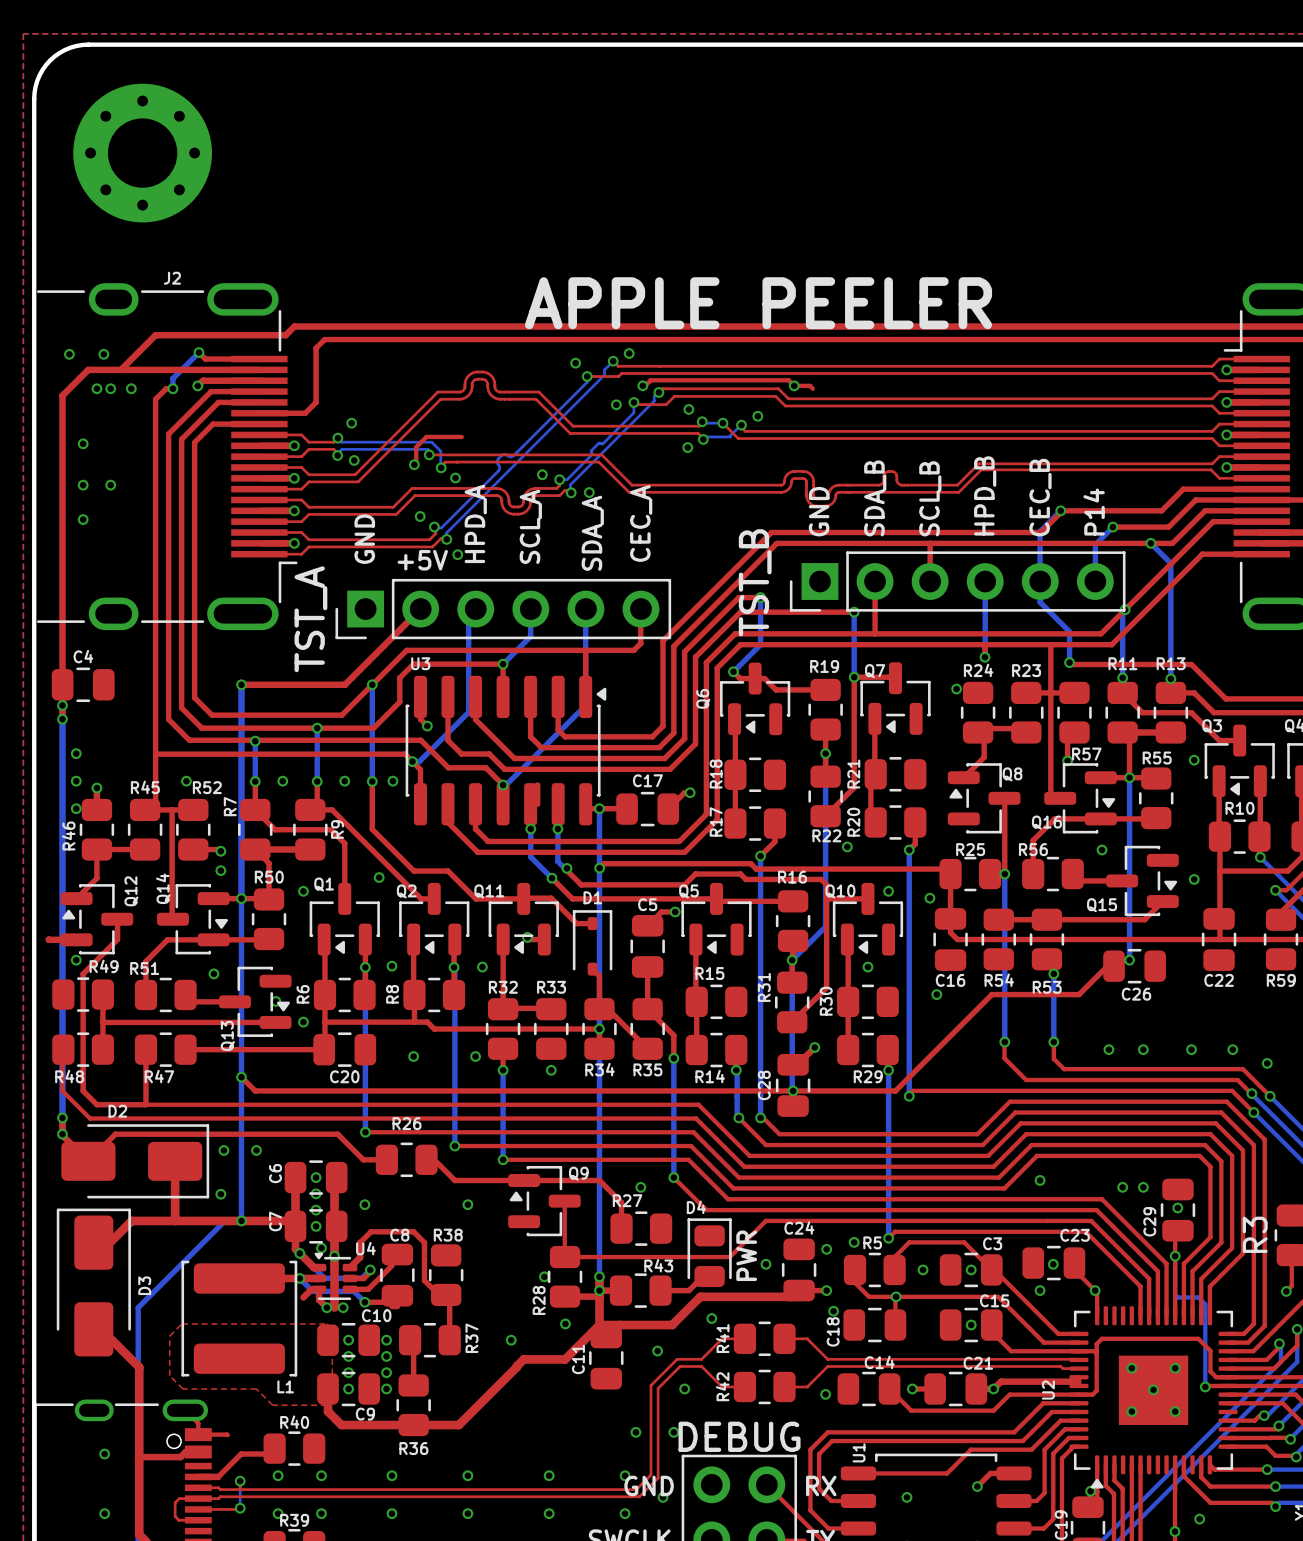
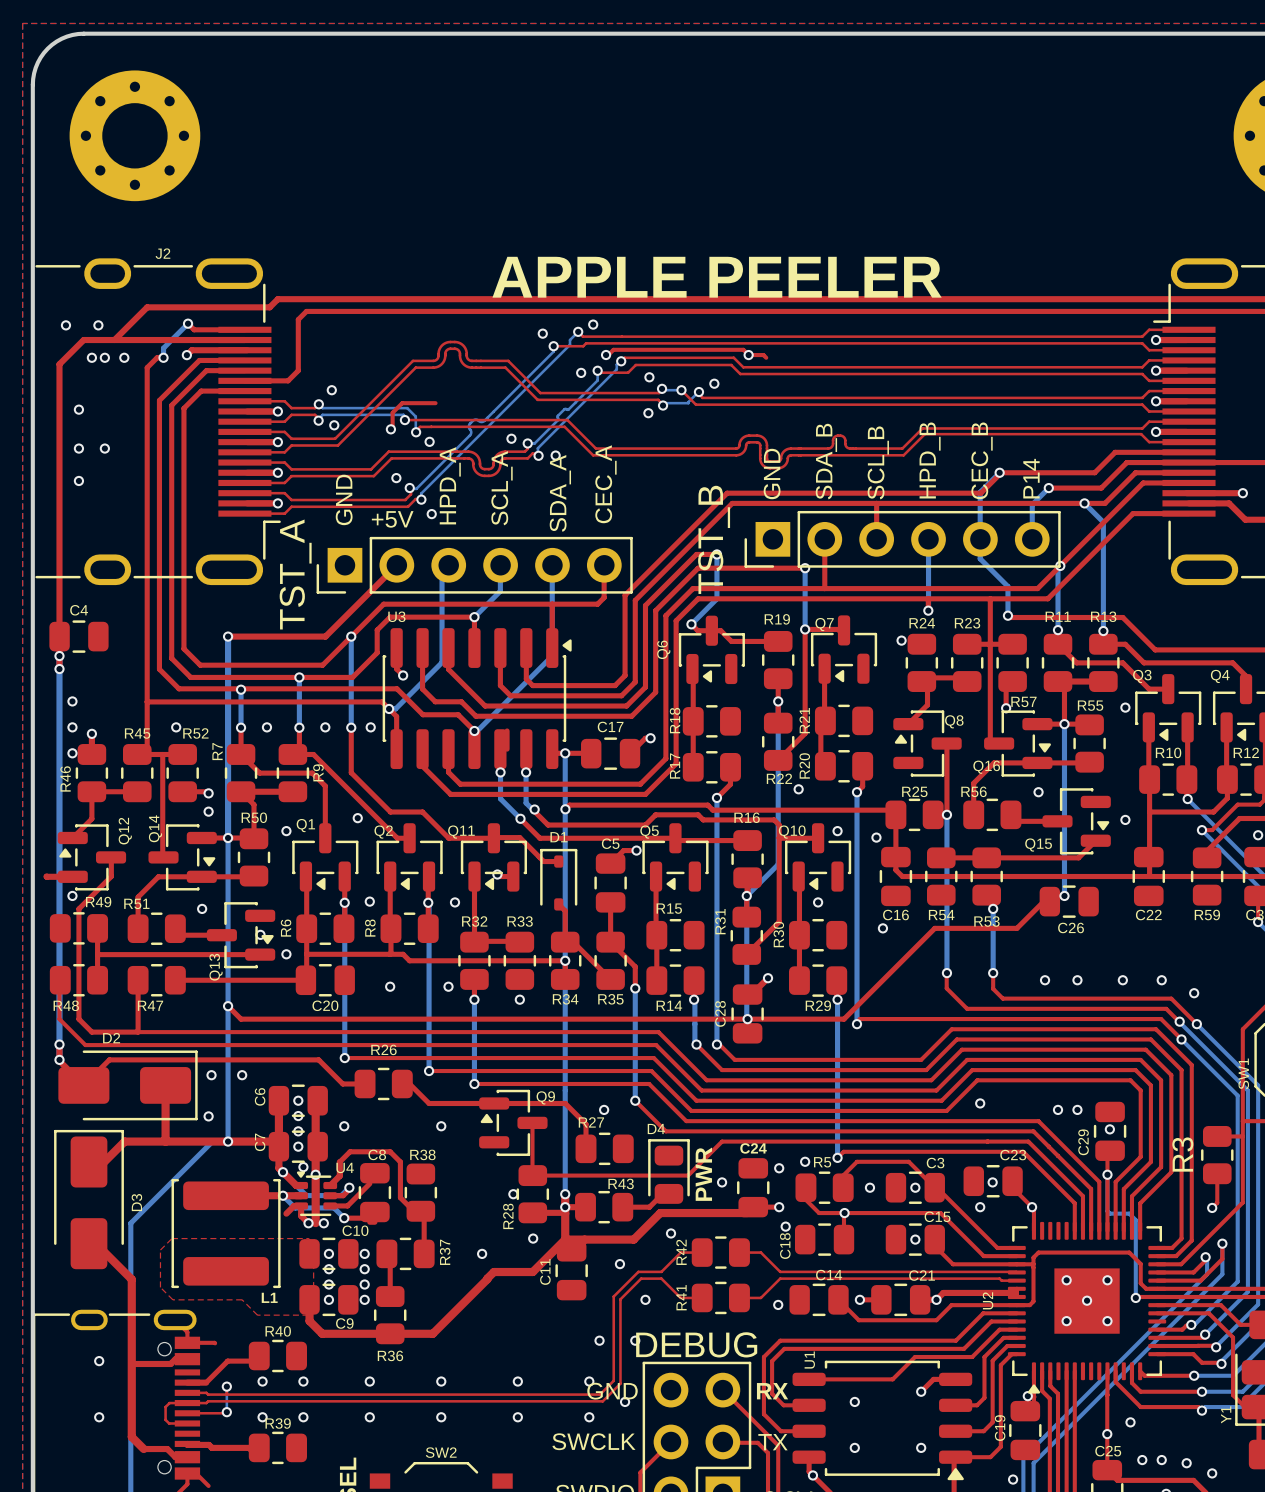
R41 name: R41 (722, 1338) -> R42 (681, 1252)
R42 name: R42 (722, 1386) -> R41 (681, 1297)

